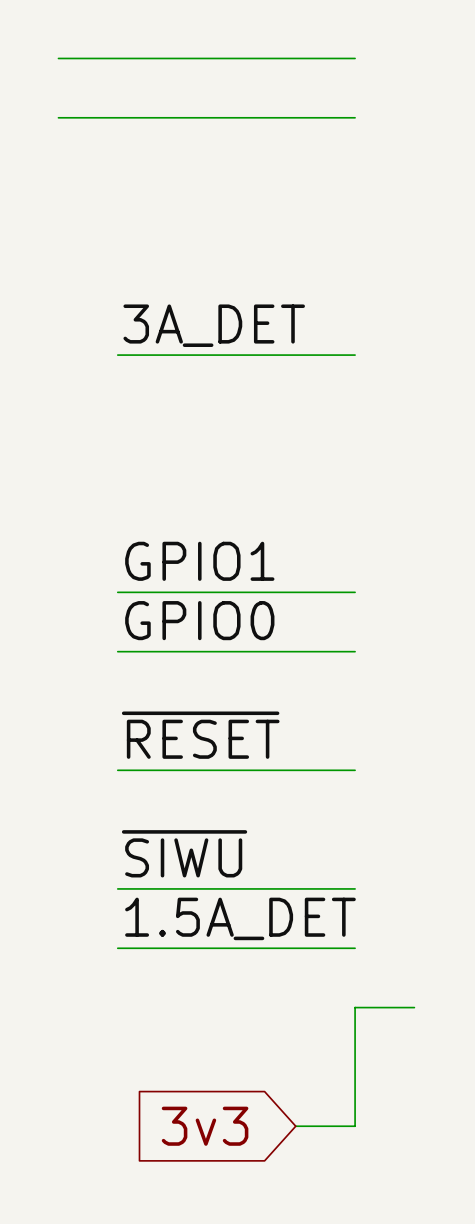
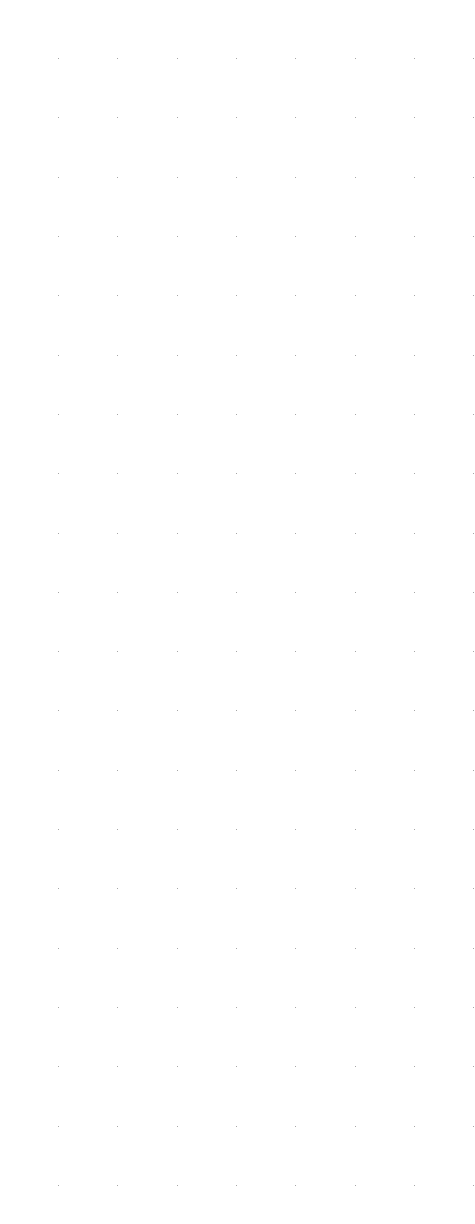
wire: (58, 58) (355, 58) -> none
wire: (58, 117) (355, 117) -> none
label: 3A_DET (214, 325) -> none
wire: (117, 355) (355, 355) -> none
label: GPIO1 (199, 561) -> none
wire: (117, 592) (355, 592) -> none
label: GPIO0 (199, 620) -> none
wire: (117, 651) (355, 651) -> none
label: ~{RESET} (200, 735) -> none
wire: (117, 770) (355, 770) -> none
label: ~{SIWU} (184, 853) -> none
wire: (117, 888) (355, 888) -> none
label: 1.5A_DET (240, 918) -> none
wire: (117, 948) (355, 948) -> none
wire: (414, 1007) (355, 1007) (355, 1126) (295, 1126) -> none
global label: 3v3 (205, 1126) -> none

